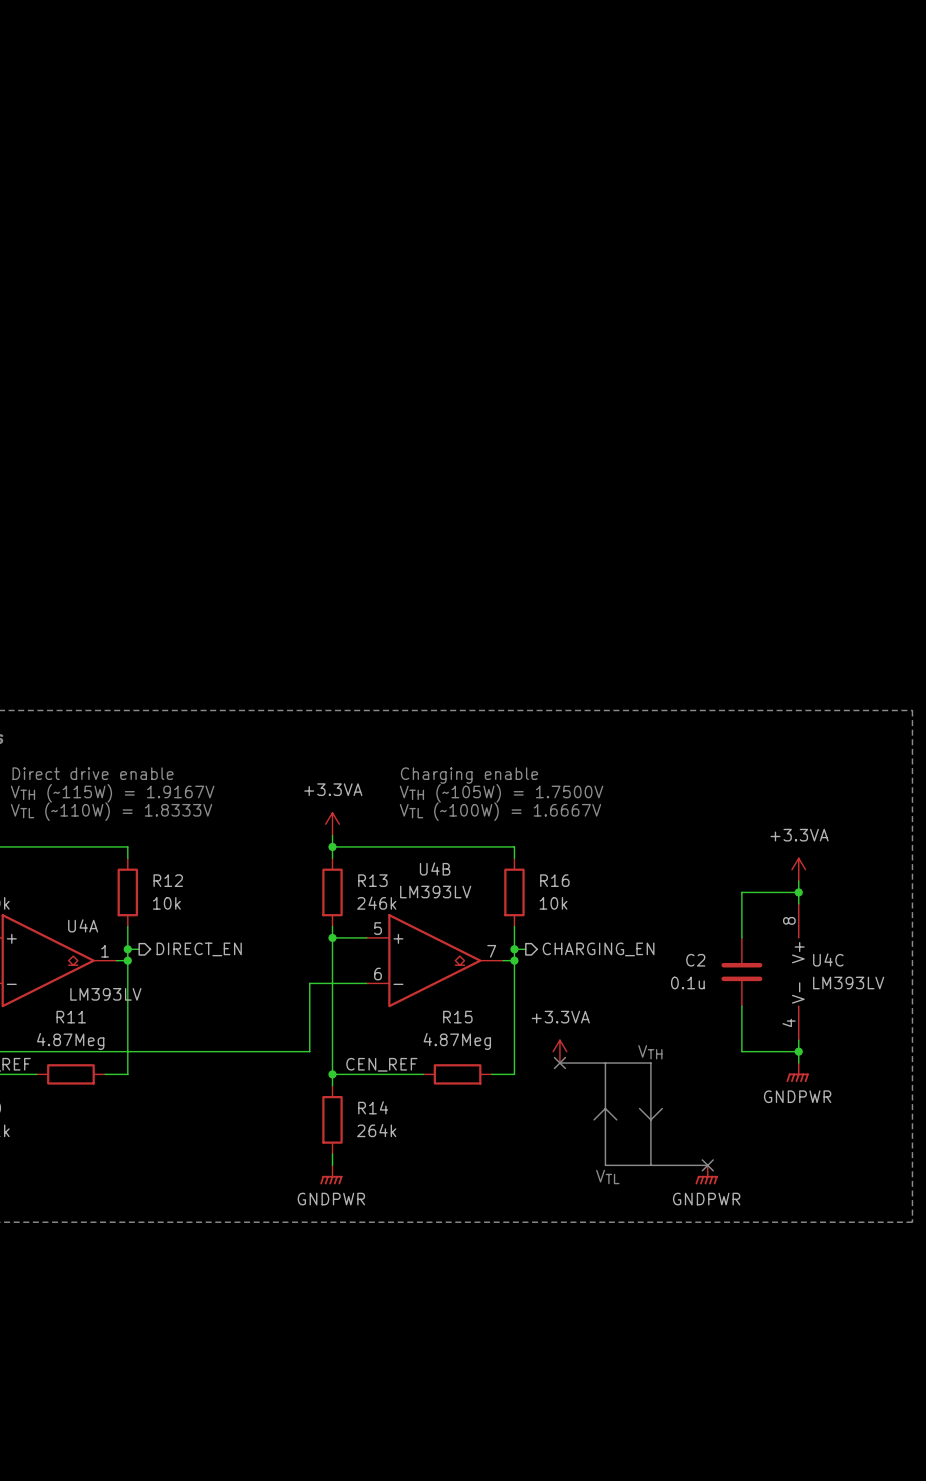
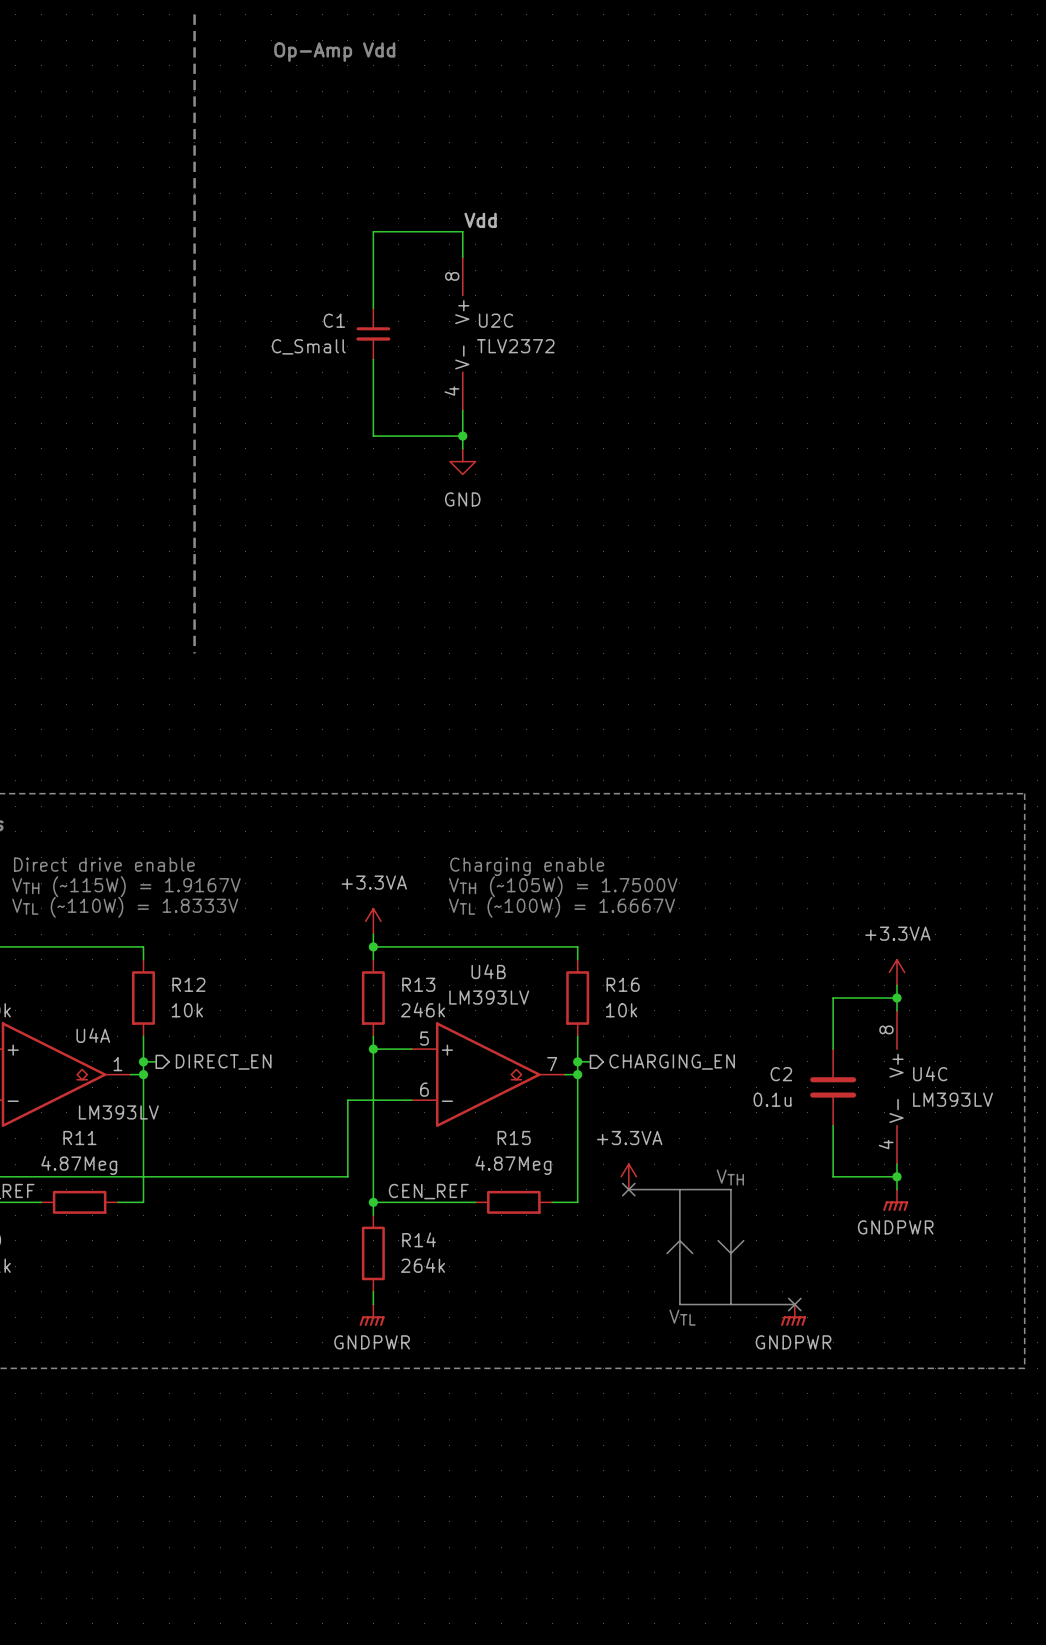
line: none -> (194, 14) (194, 653)
text: none -> Op-Amp Vdd (334, 52)
label: none -> Vdd (480, 220)
wire: none -> (462, 257) (462, 231) (373, 231) (373, 308)
C1: none -> C_Small (373, 333)
U2C: none -> TLV2372 (462, 333)
wire: none -> (373, 359) (373, 436) (462, 436)
wire: none -> (462, 410) (462, 448)
junction: none -> (462, 436)
power symbol: none -> GND (462, 461)

